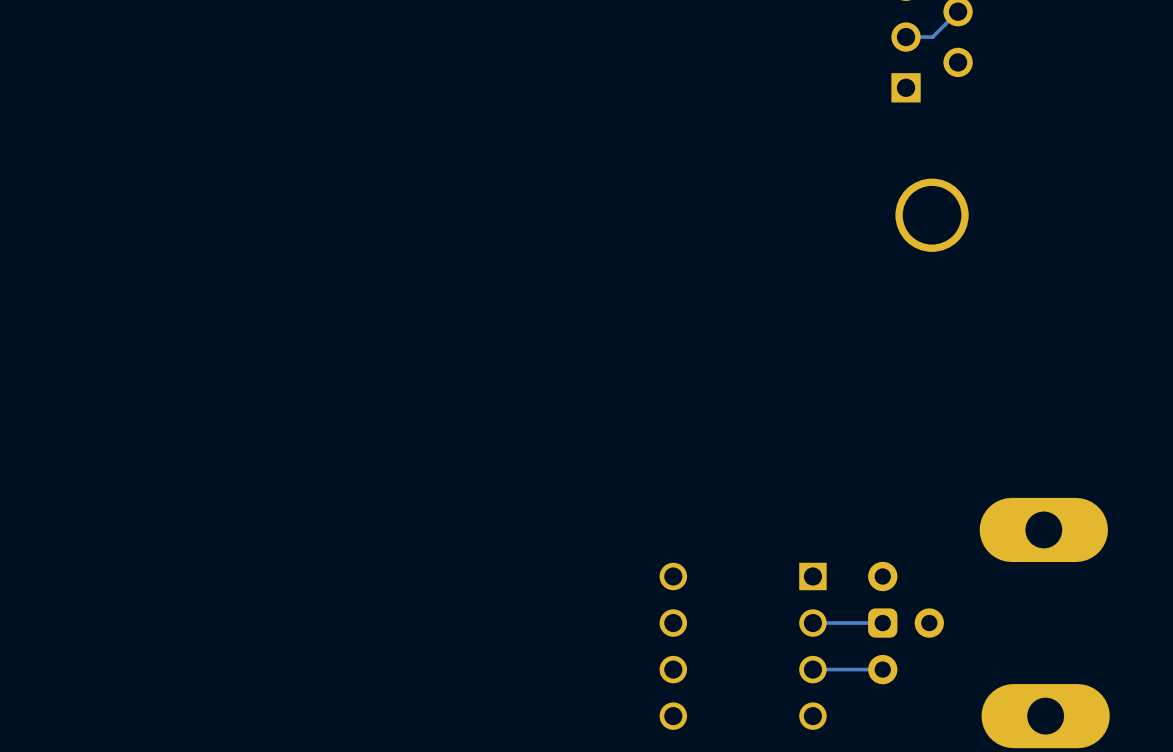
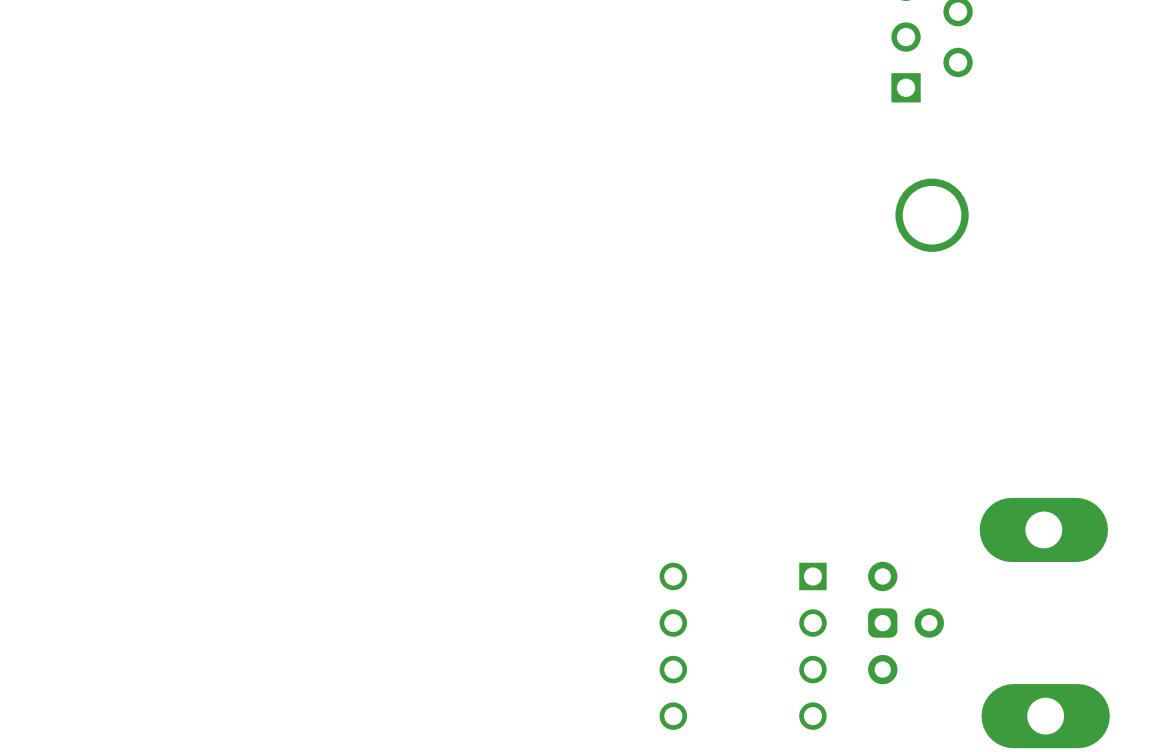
track: (958, 11) (932, 37) (906, 37) -> none
track: (882, 623) (812, 623) -> none
track: (882, 669) (812, 669) -> none

